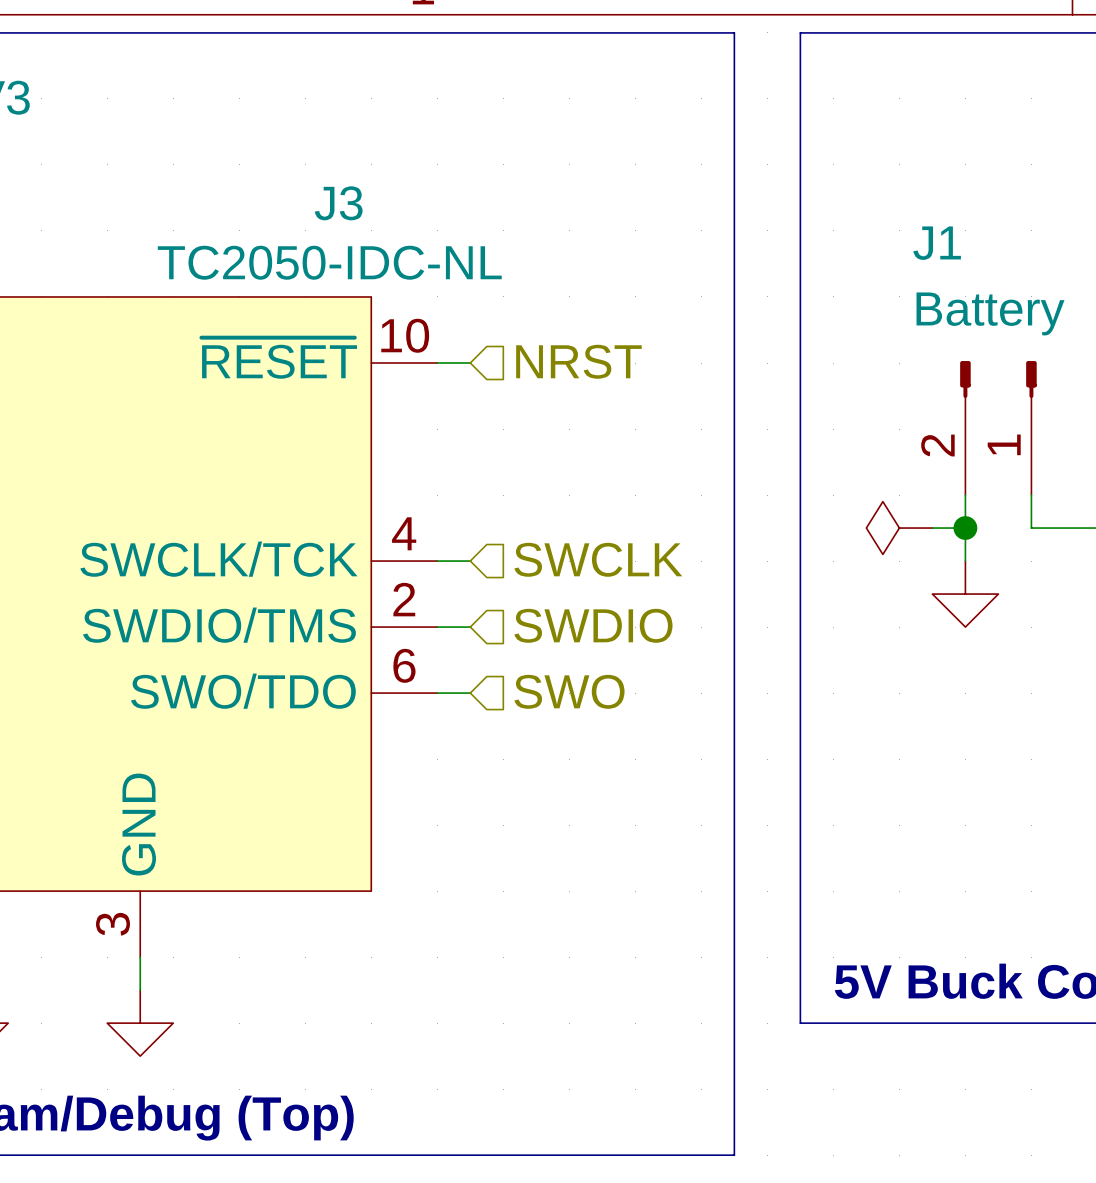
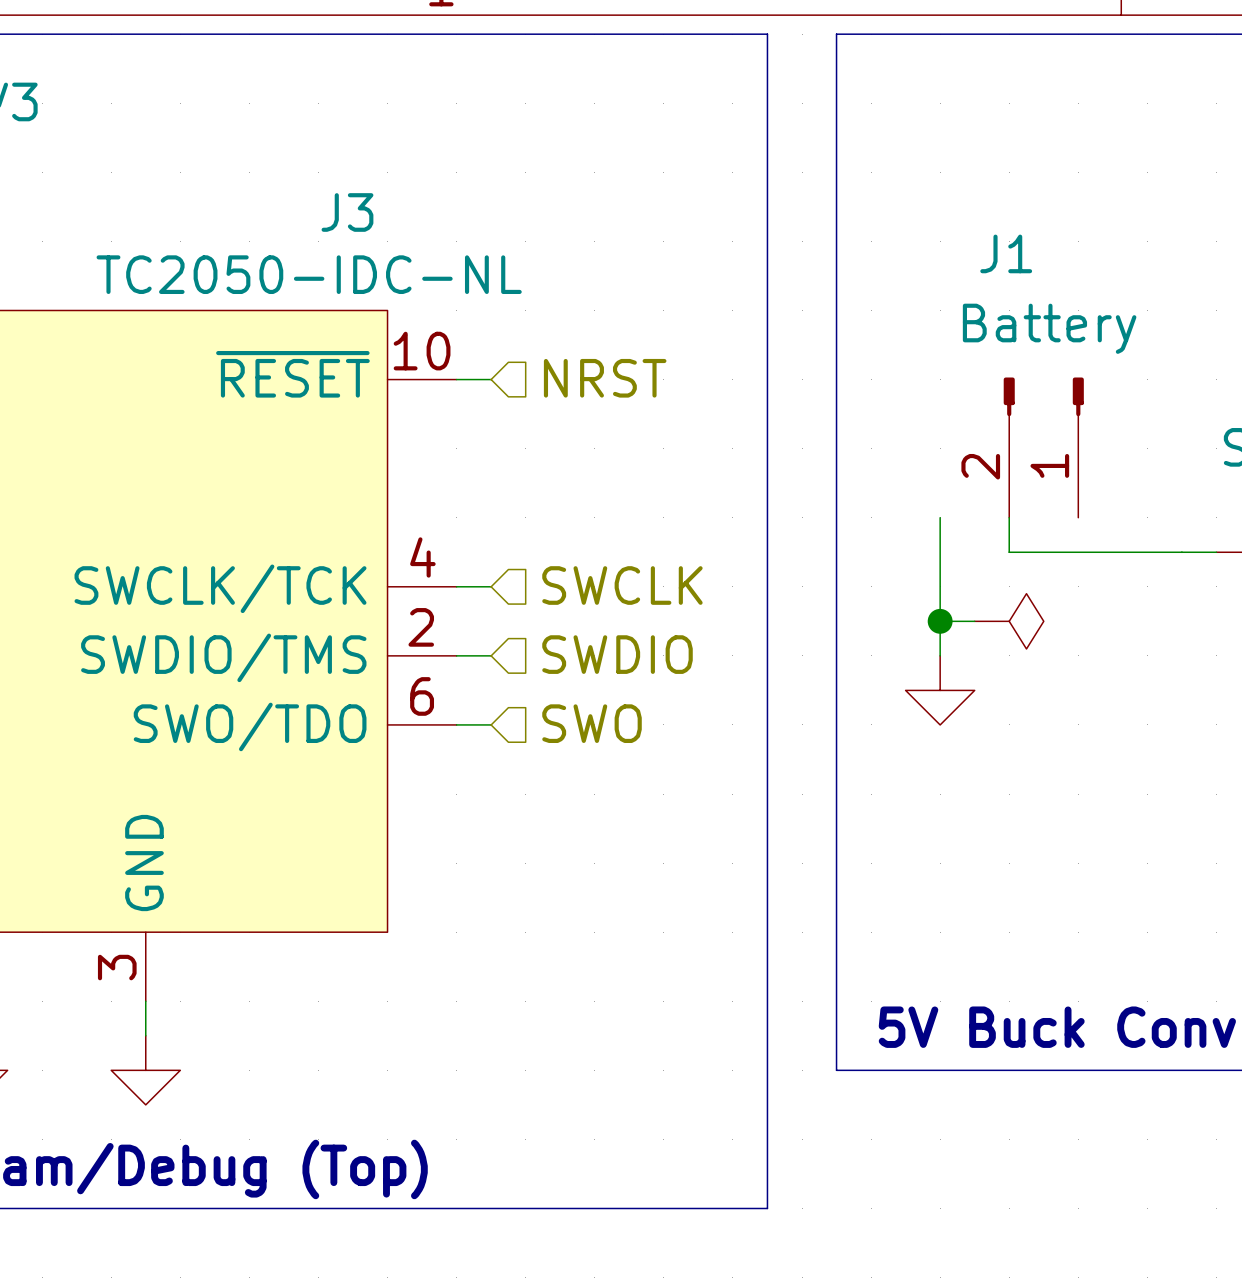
J1 name position: J1 (937, 243) -> J1 (1006, 253)
wire: none -> (940, 517) (940, 655)
wire: (1031, 495) (1031, 528) -> (1009, 552) (1078, 552)
power symbol: (899, 528) -> none
wire: (932, 528) (965, 528) (965, 561) -> none
junction position: (965, 528) -> (940, 621)
power symbol shape: [932, 561, 999, 628] -> [974, 593, 1044, 649]
wire: none -> (940, 621) (974, 621)
power symbol: none -> (940, 690)

